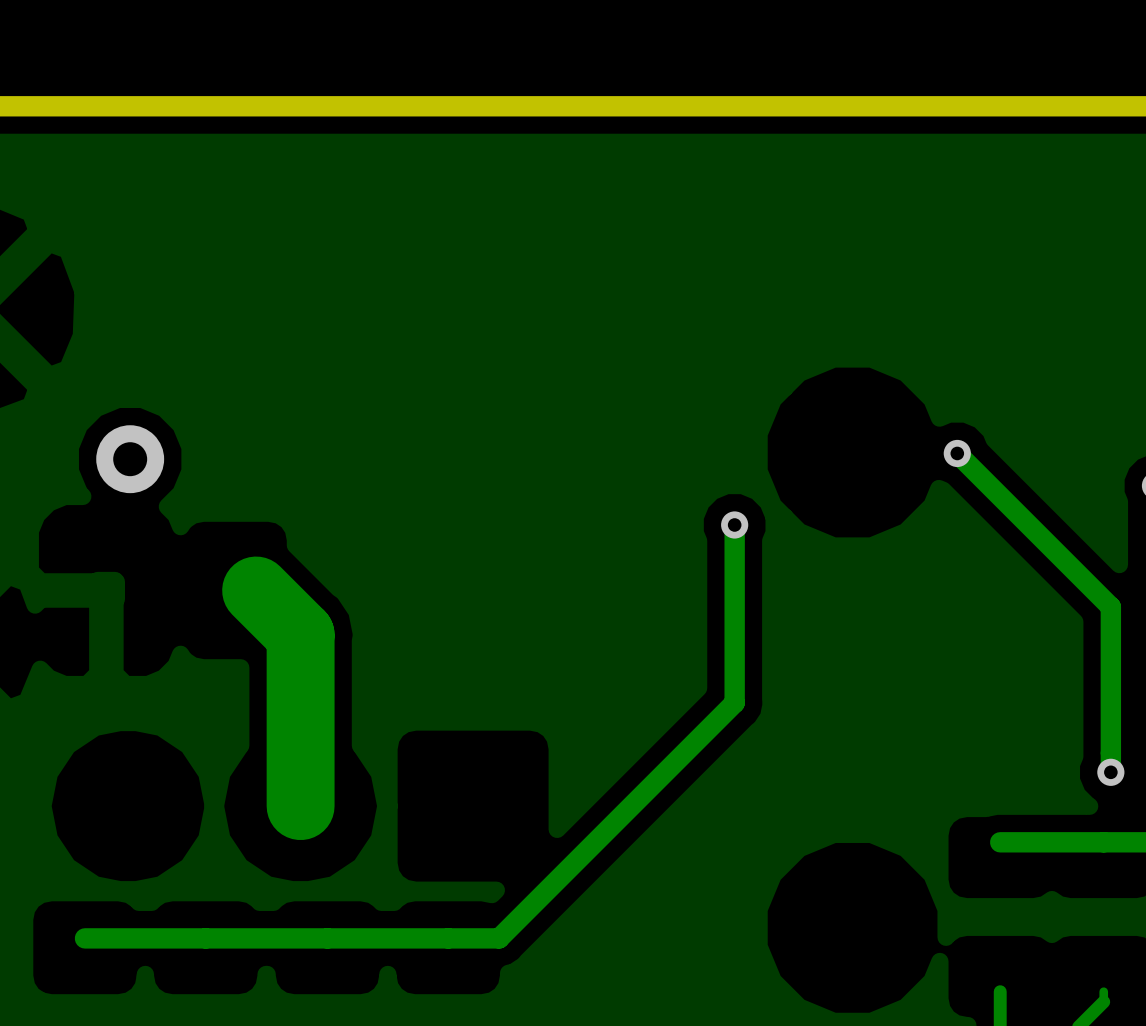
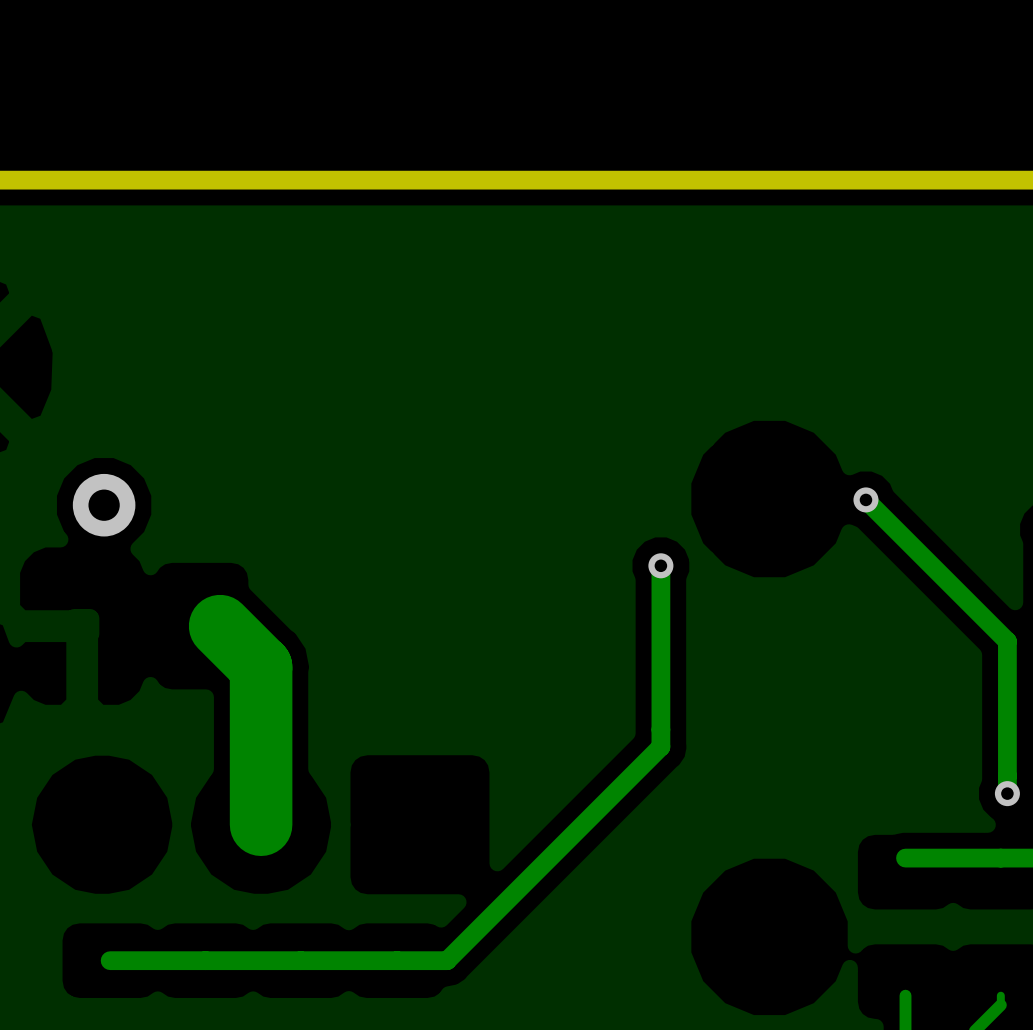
track: (734, 702) (499, 938) (84, 938) -> (660, 729) (660, 746) (447, 960) (110, 960)

